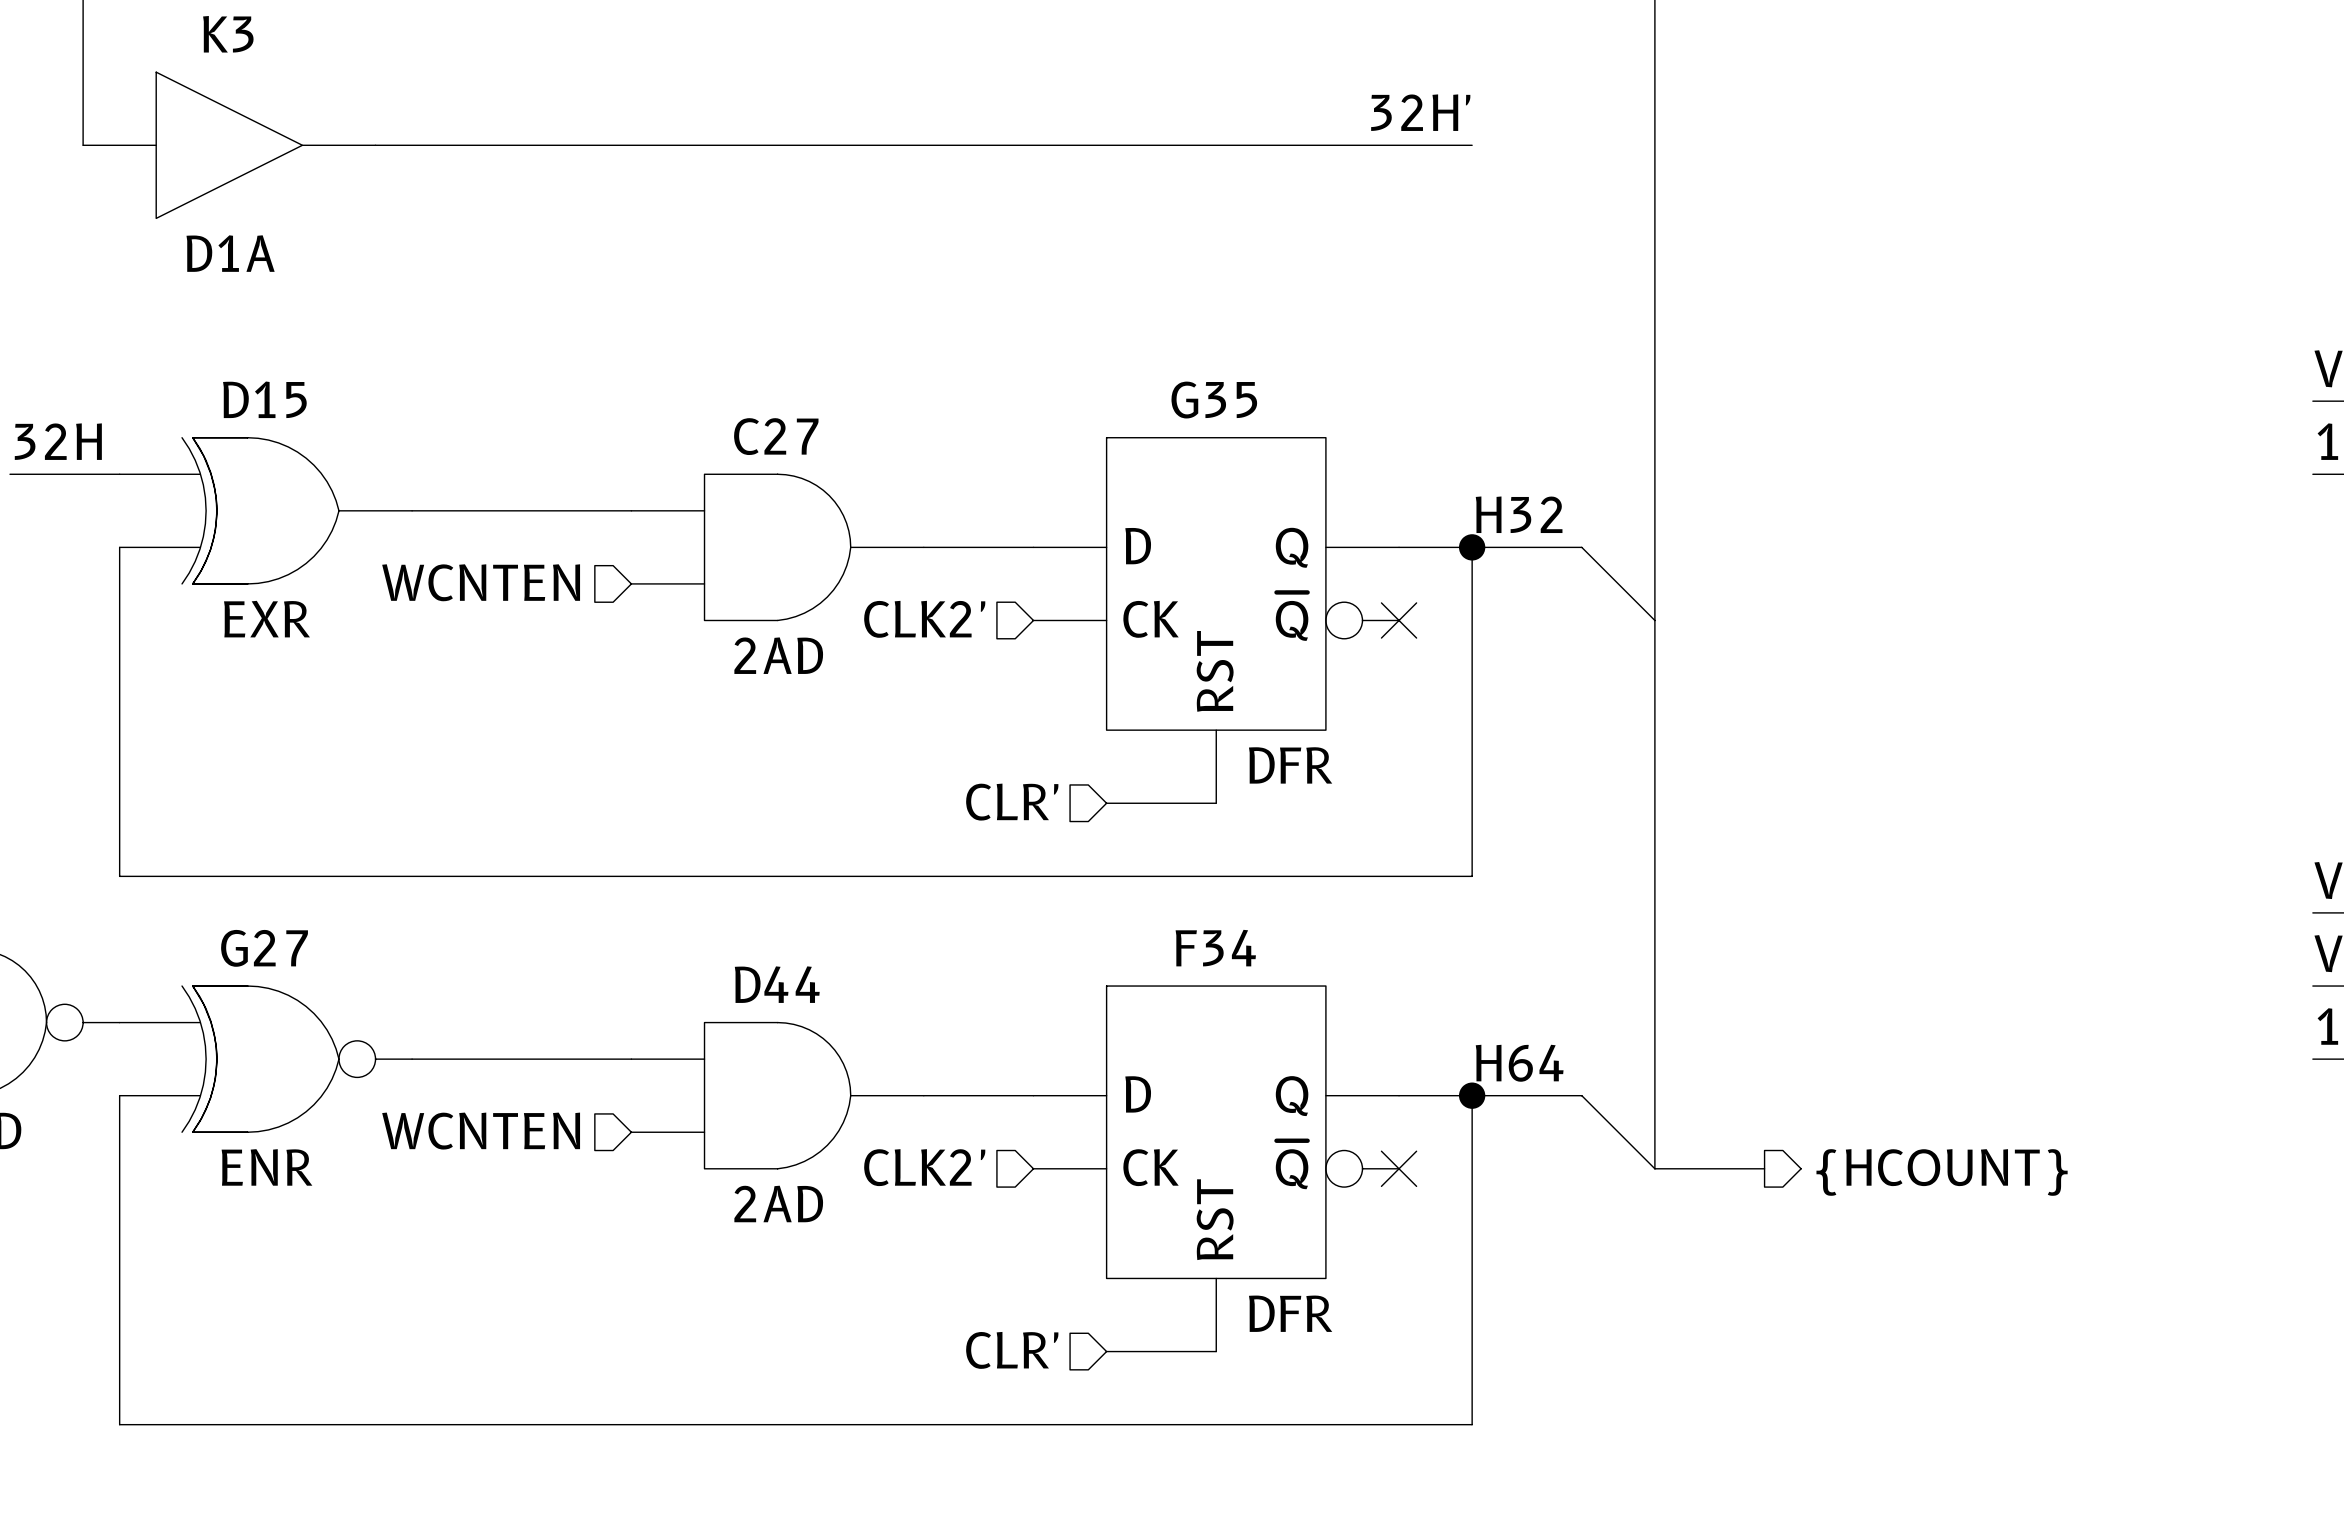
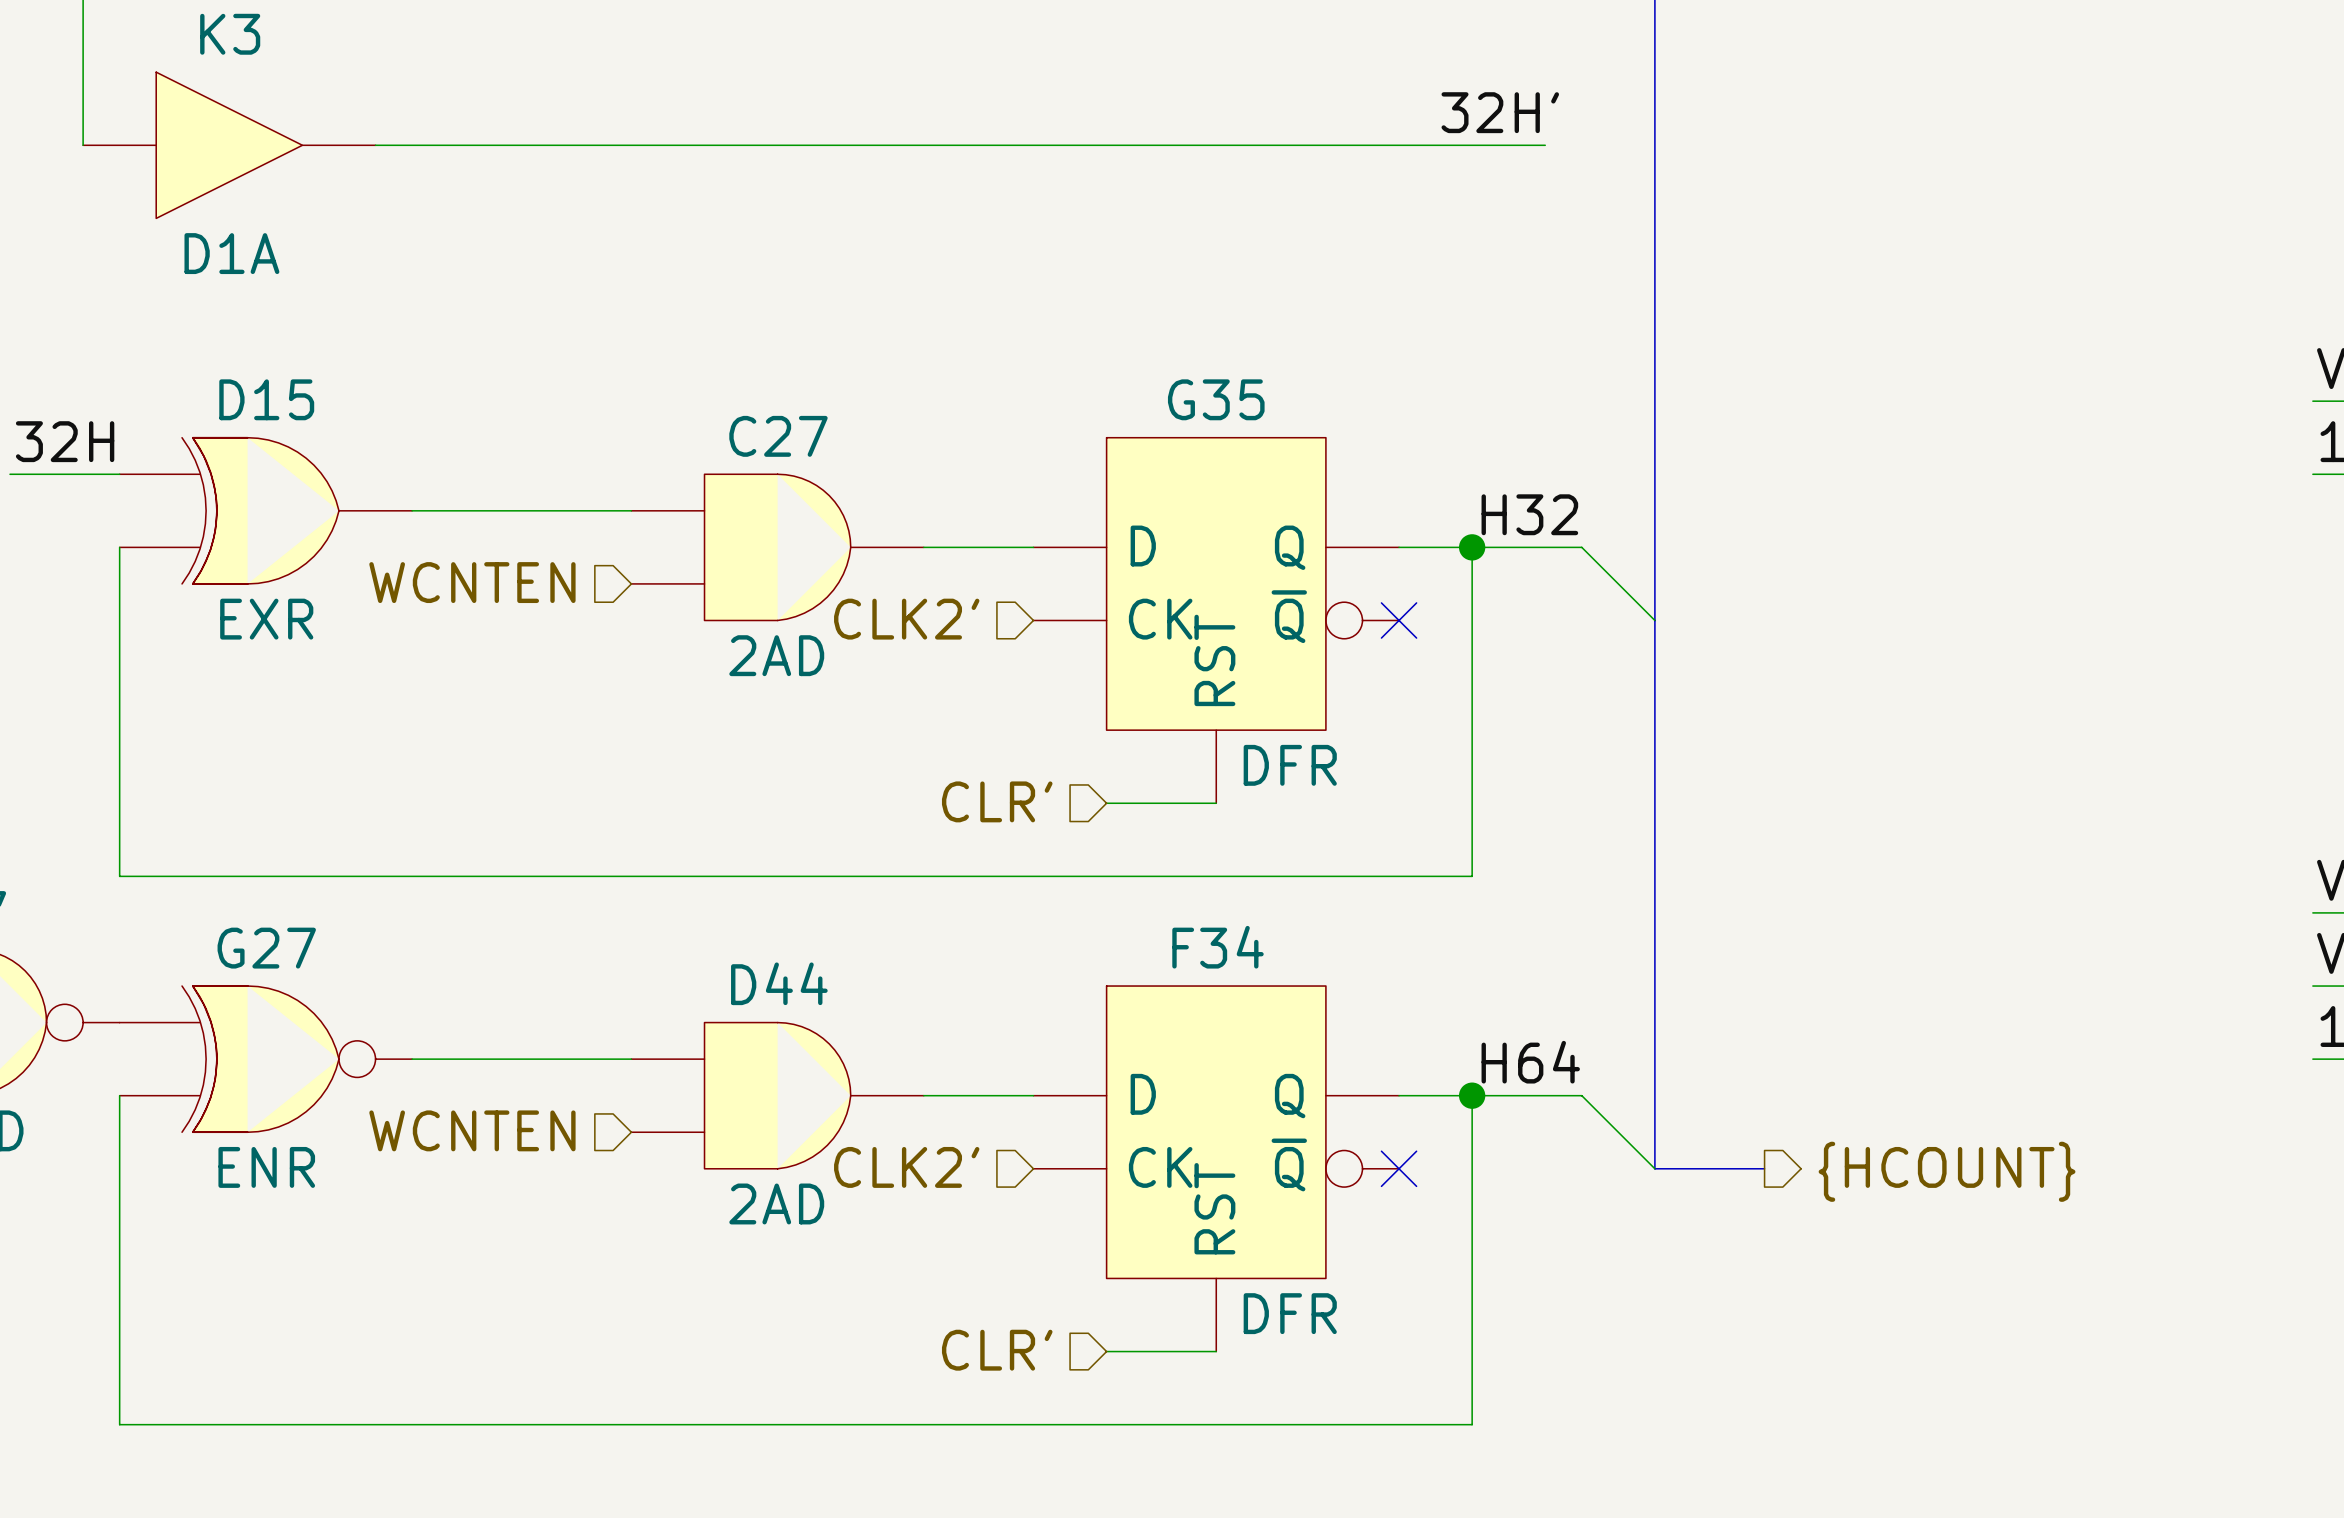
label position: 32H' (1420, 112) -> 32H' (1500, 112)
wire: none -> (1472, 145) (1545, 145)

